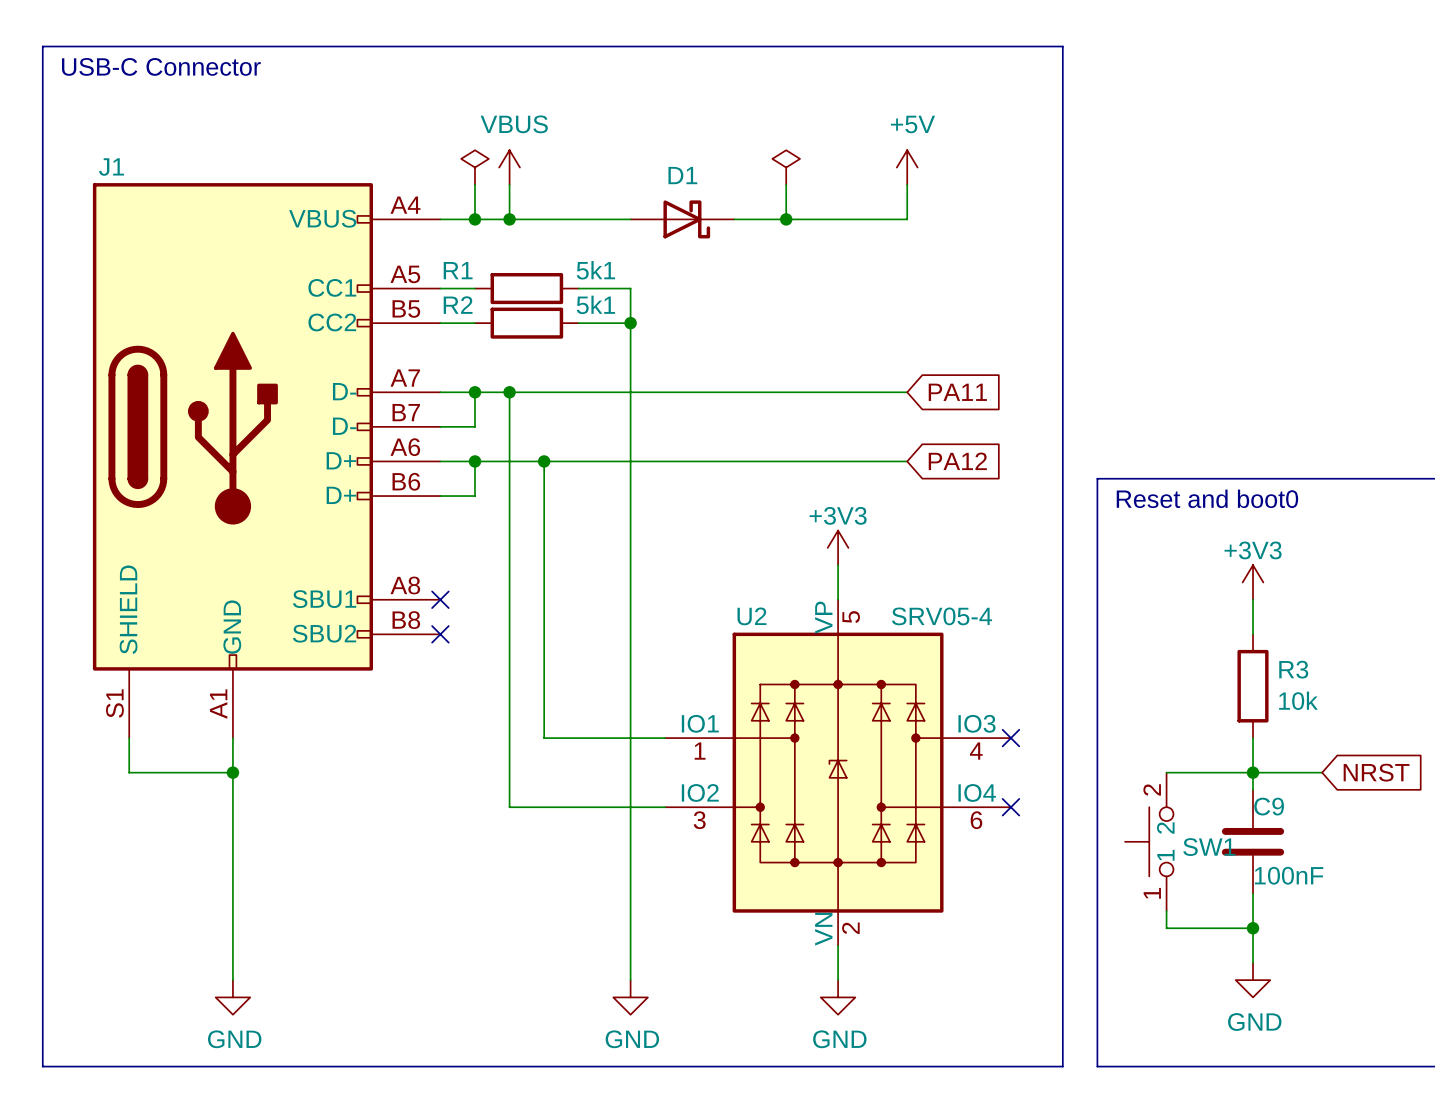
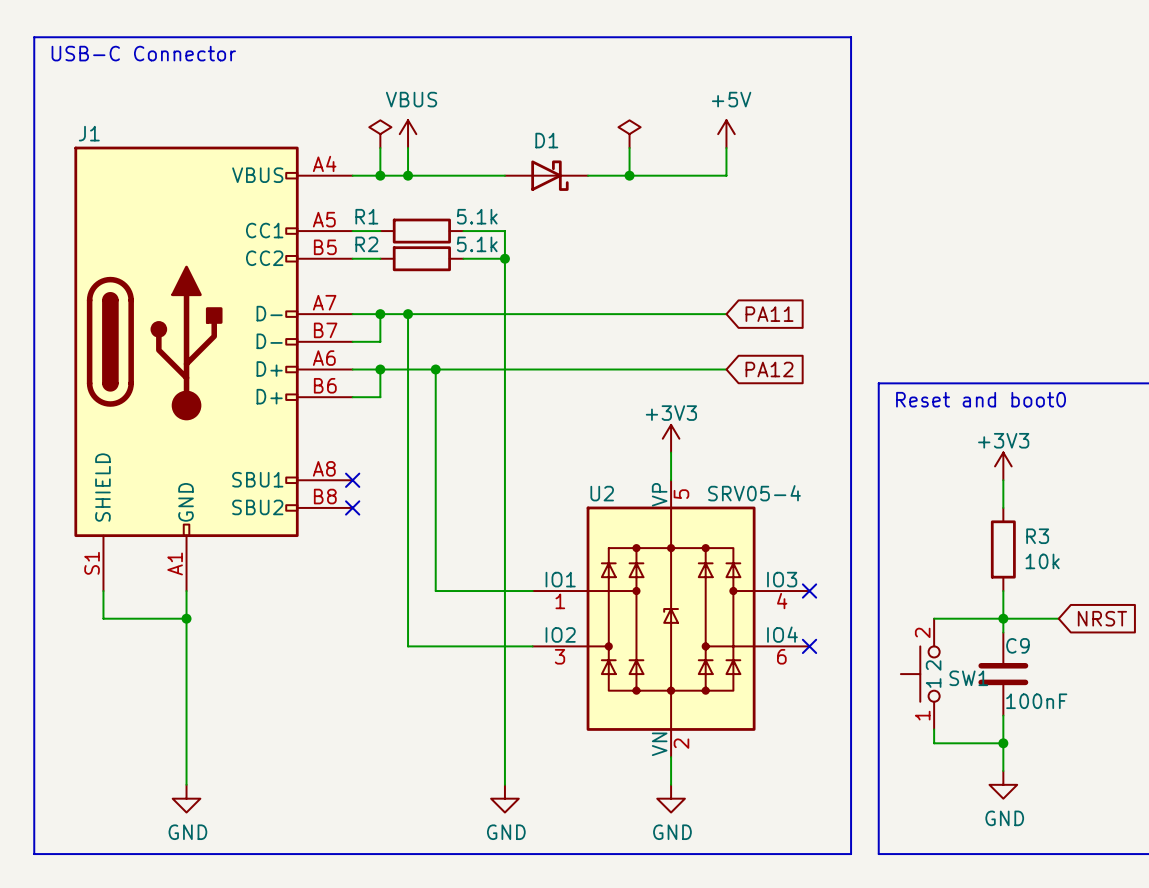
R1 text: 5k1 (595, 270) -> 5.1k (477, 216)
R2 text: 5k1 (595, 304) -> 5.1k (477, 244)

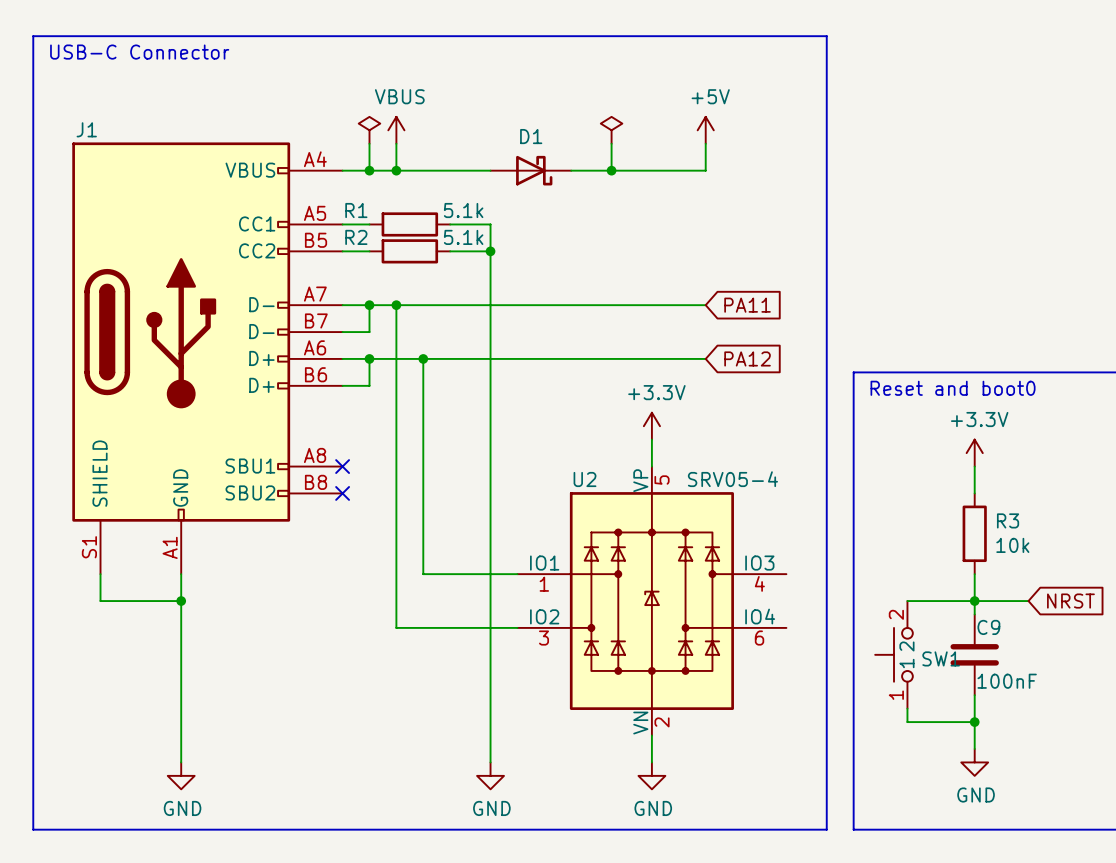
power symbol: +3V3 (671, 438) -> +3.3V (651, 426)
power symbol: +3V3 (1003, 466) -> +3.3V (974, 453)
no-connect mark: (809, 591) -> none
no-connect mark: (809, 646) -> none

